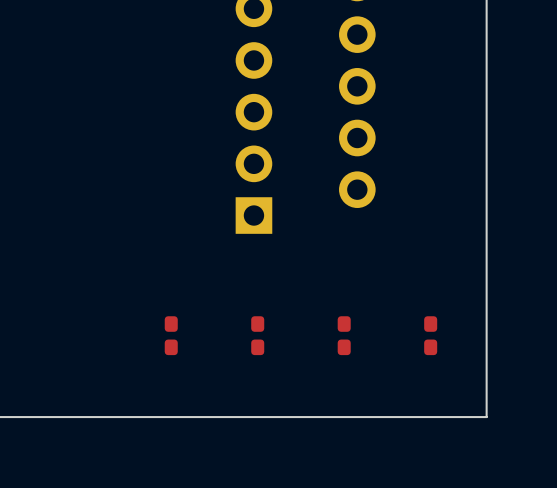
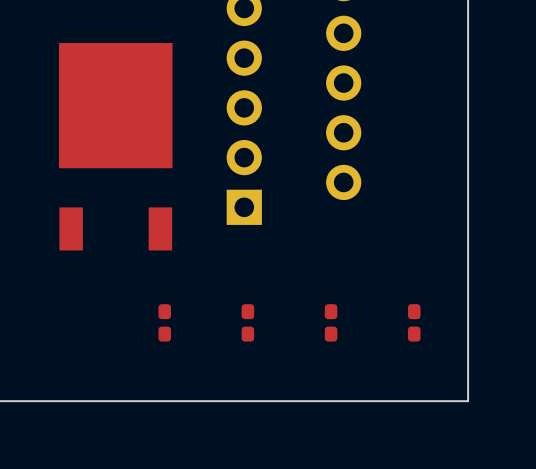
part: none -> (115, 146)

